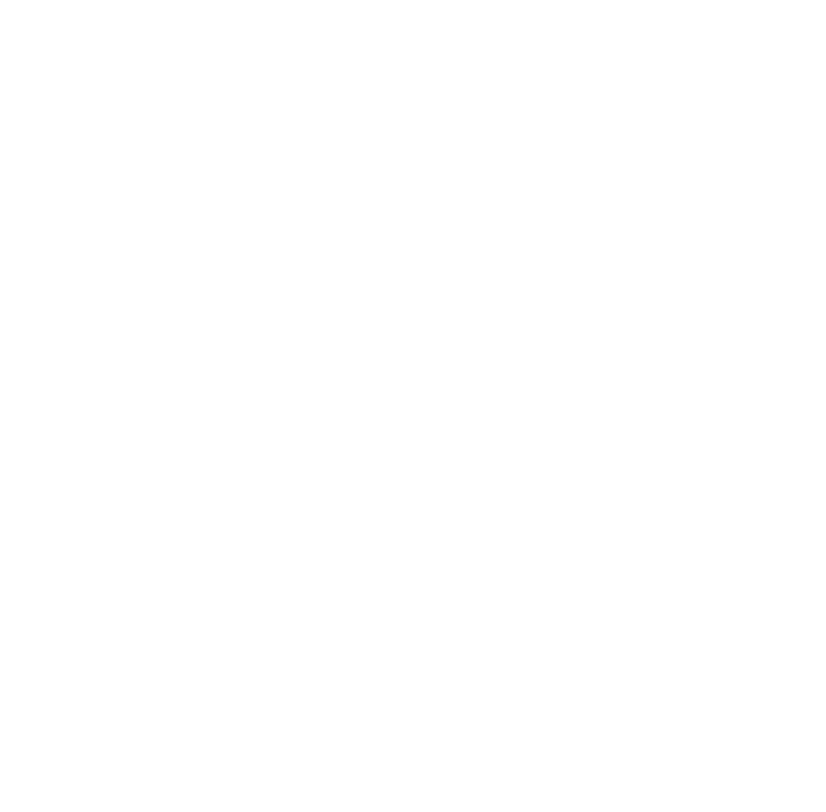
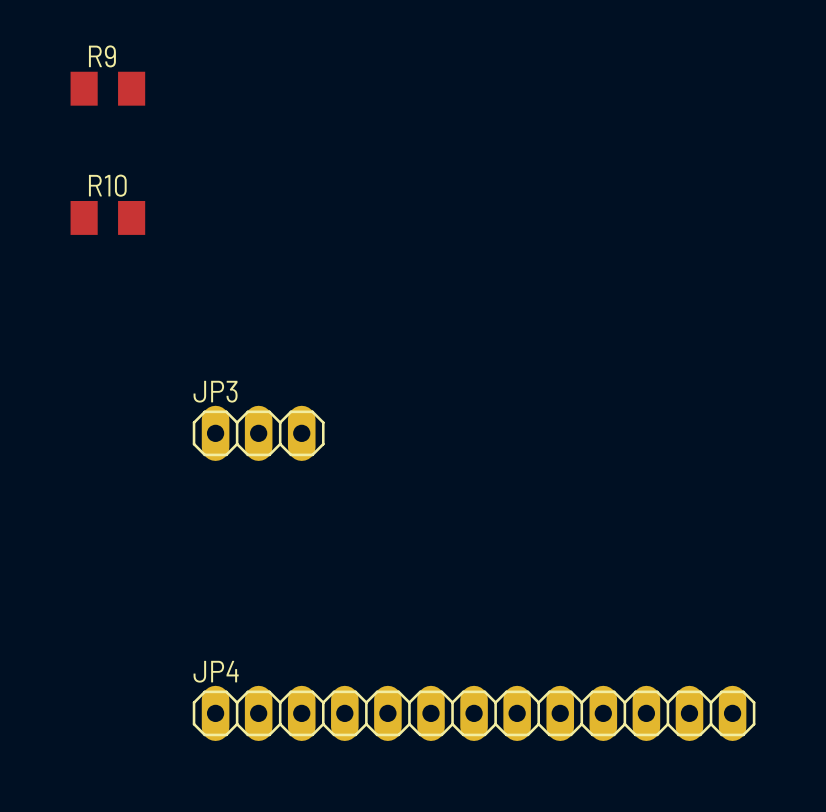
R9: none -> (107, 88)
R10: none -> (107, 217)
JP3: none -> (258, 433)
JP4: none -> (474, 713)

